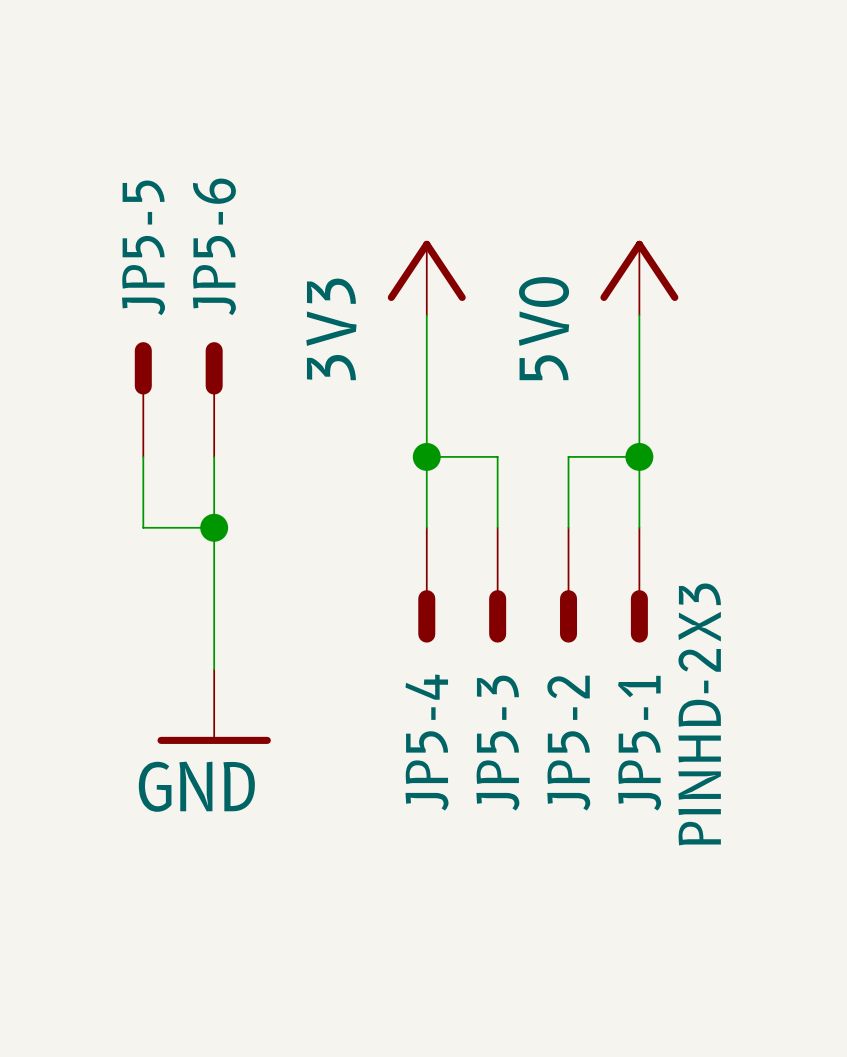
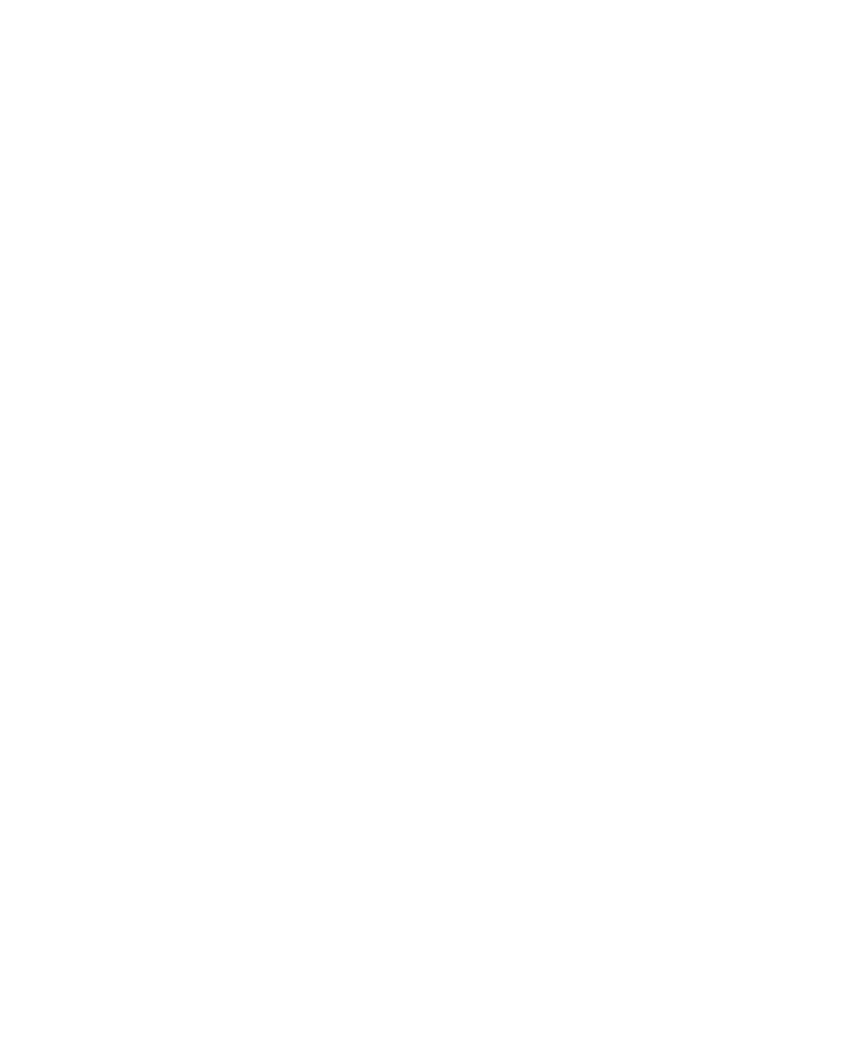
power symbol: 3V3 (426, 277) -> none
power symbol: 5V0 (639, 277) -> none
wire: (426, 315) (426, 527) -> none
wire: (639, 315) (639, 527) -> none
JP5-5: (143, 399) -> none
JP5-6: (214, 399) -> none
wire: (143, 456) (143, 527) (214, 527) -> none
wire: (214, 456) (214, 669) -> none
wire: (426, 456) (497, 456) (497, 527) -> none
junction: (426, 456) -> none
wire: (639, 456) (568, 456) (568, 527) -> none
junction: (639, 456) -> none
junction: (214, 527) -> none
JP5-4: (426, 585) -> none
JP5-3: (497, 585) -> none
JP5-2: (568, 585) -> none
JP5-1: PINHD-2X3 (639, 585) -> none
power symbol: GND (214, 706) -> none

